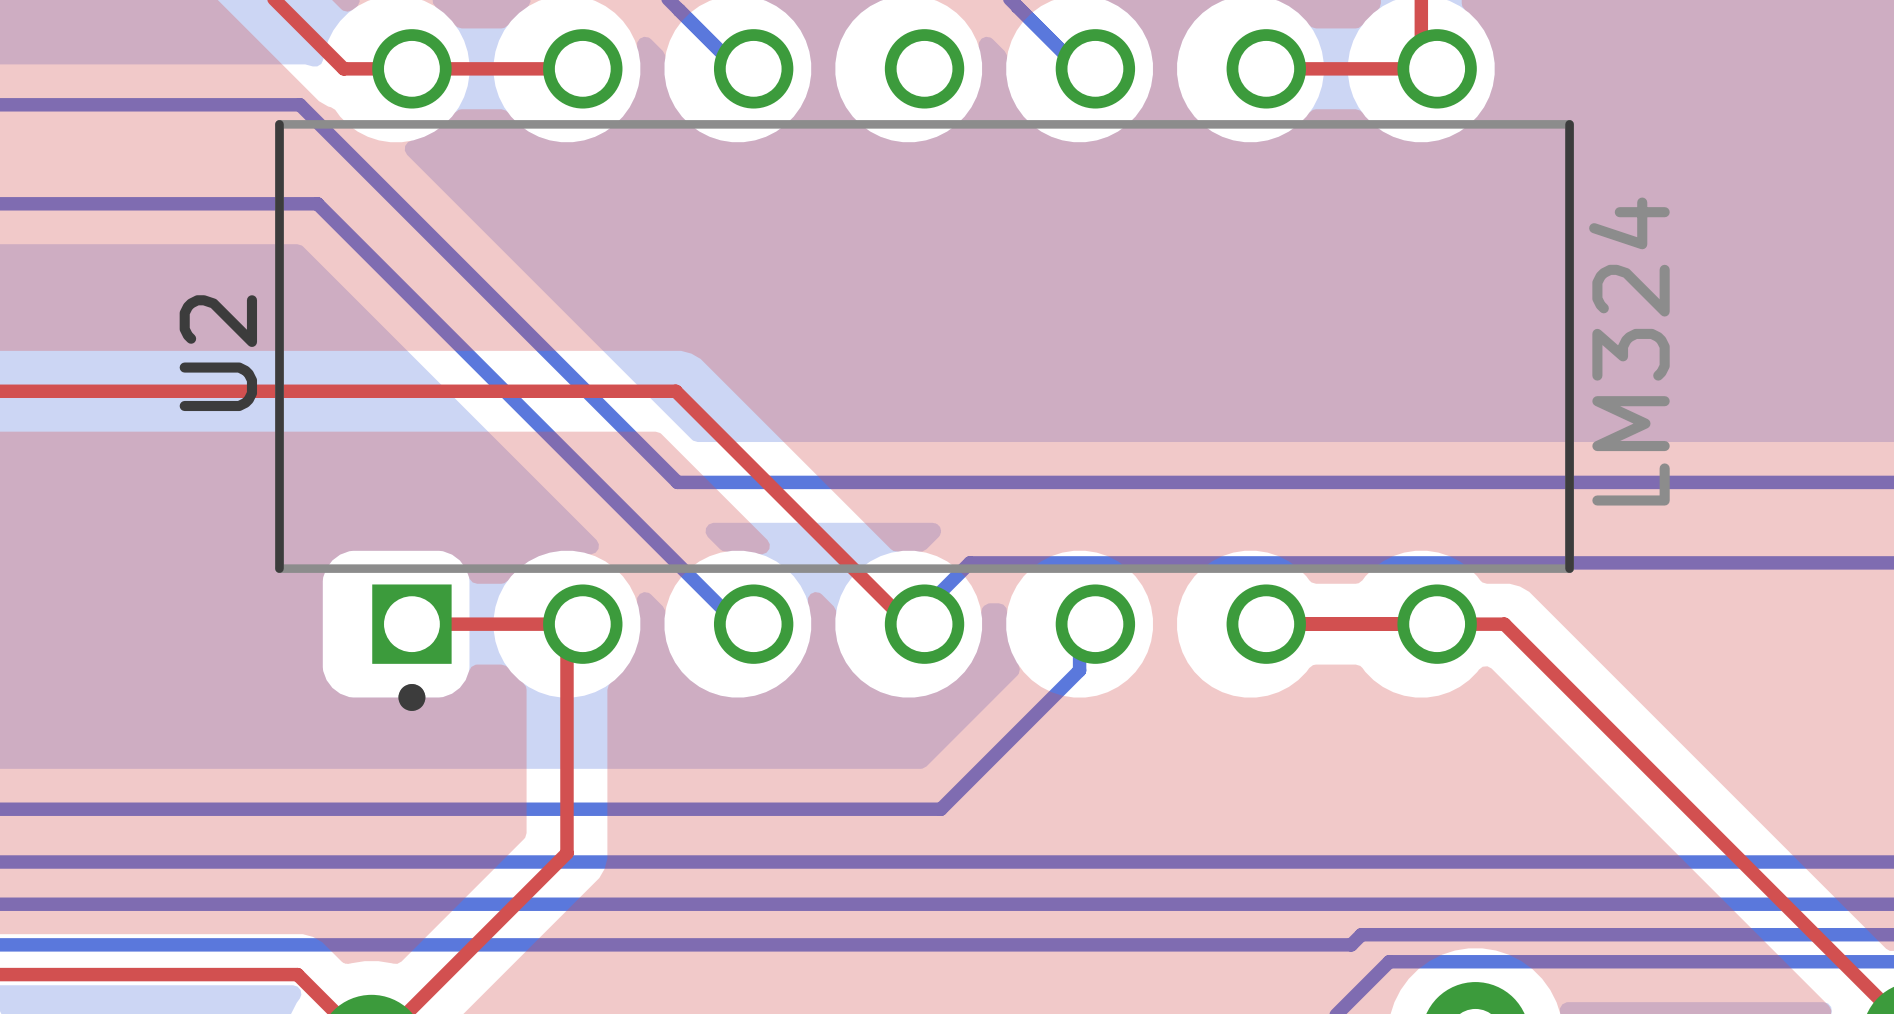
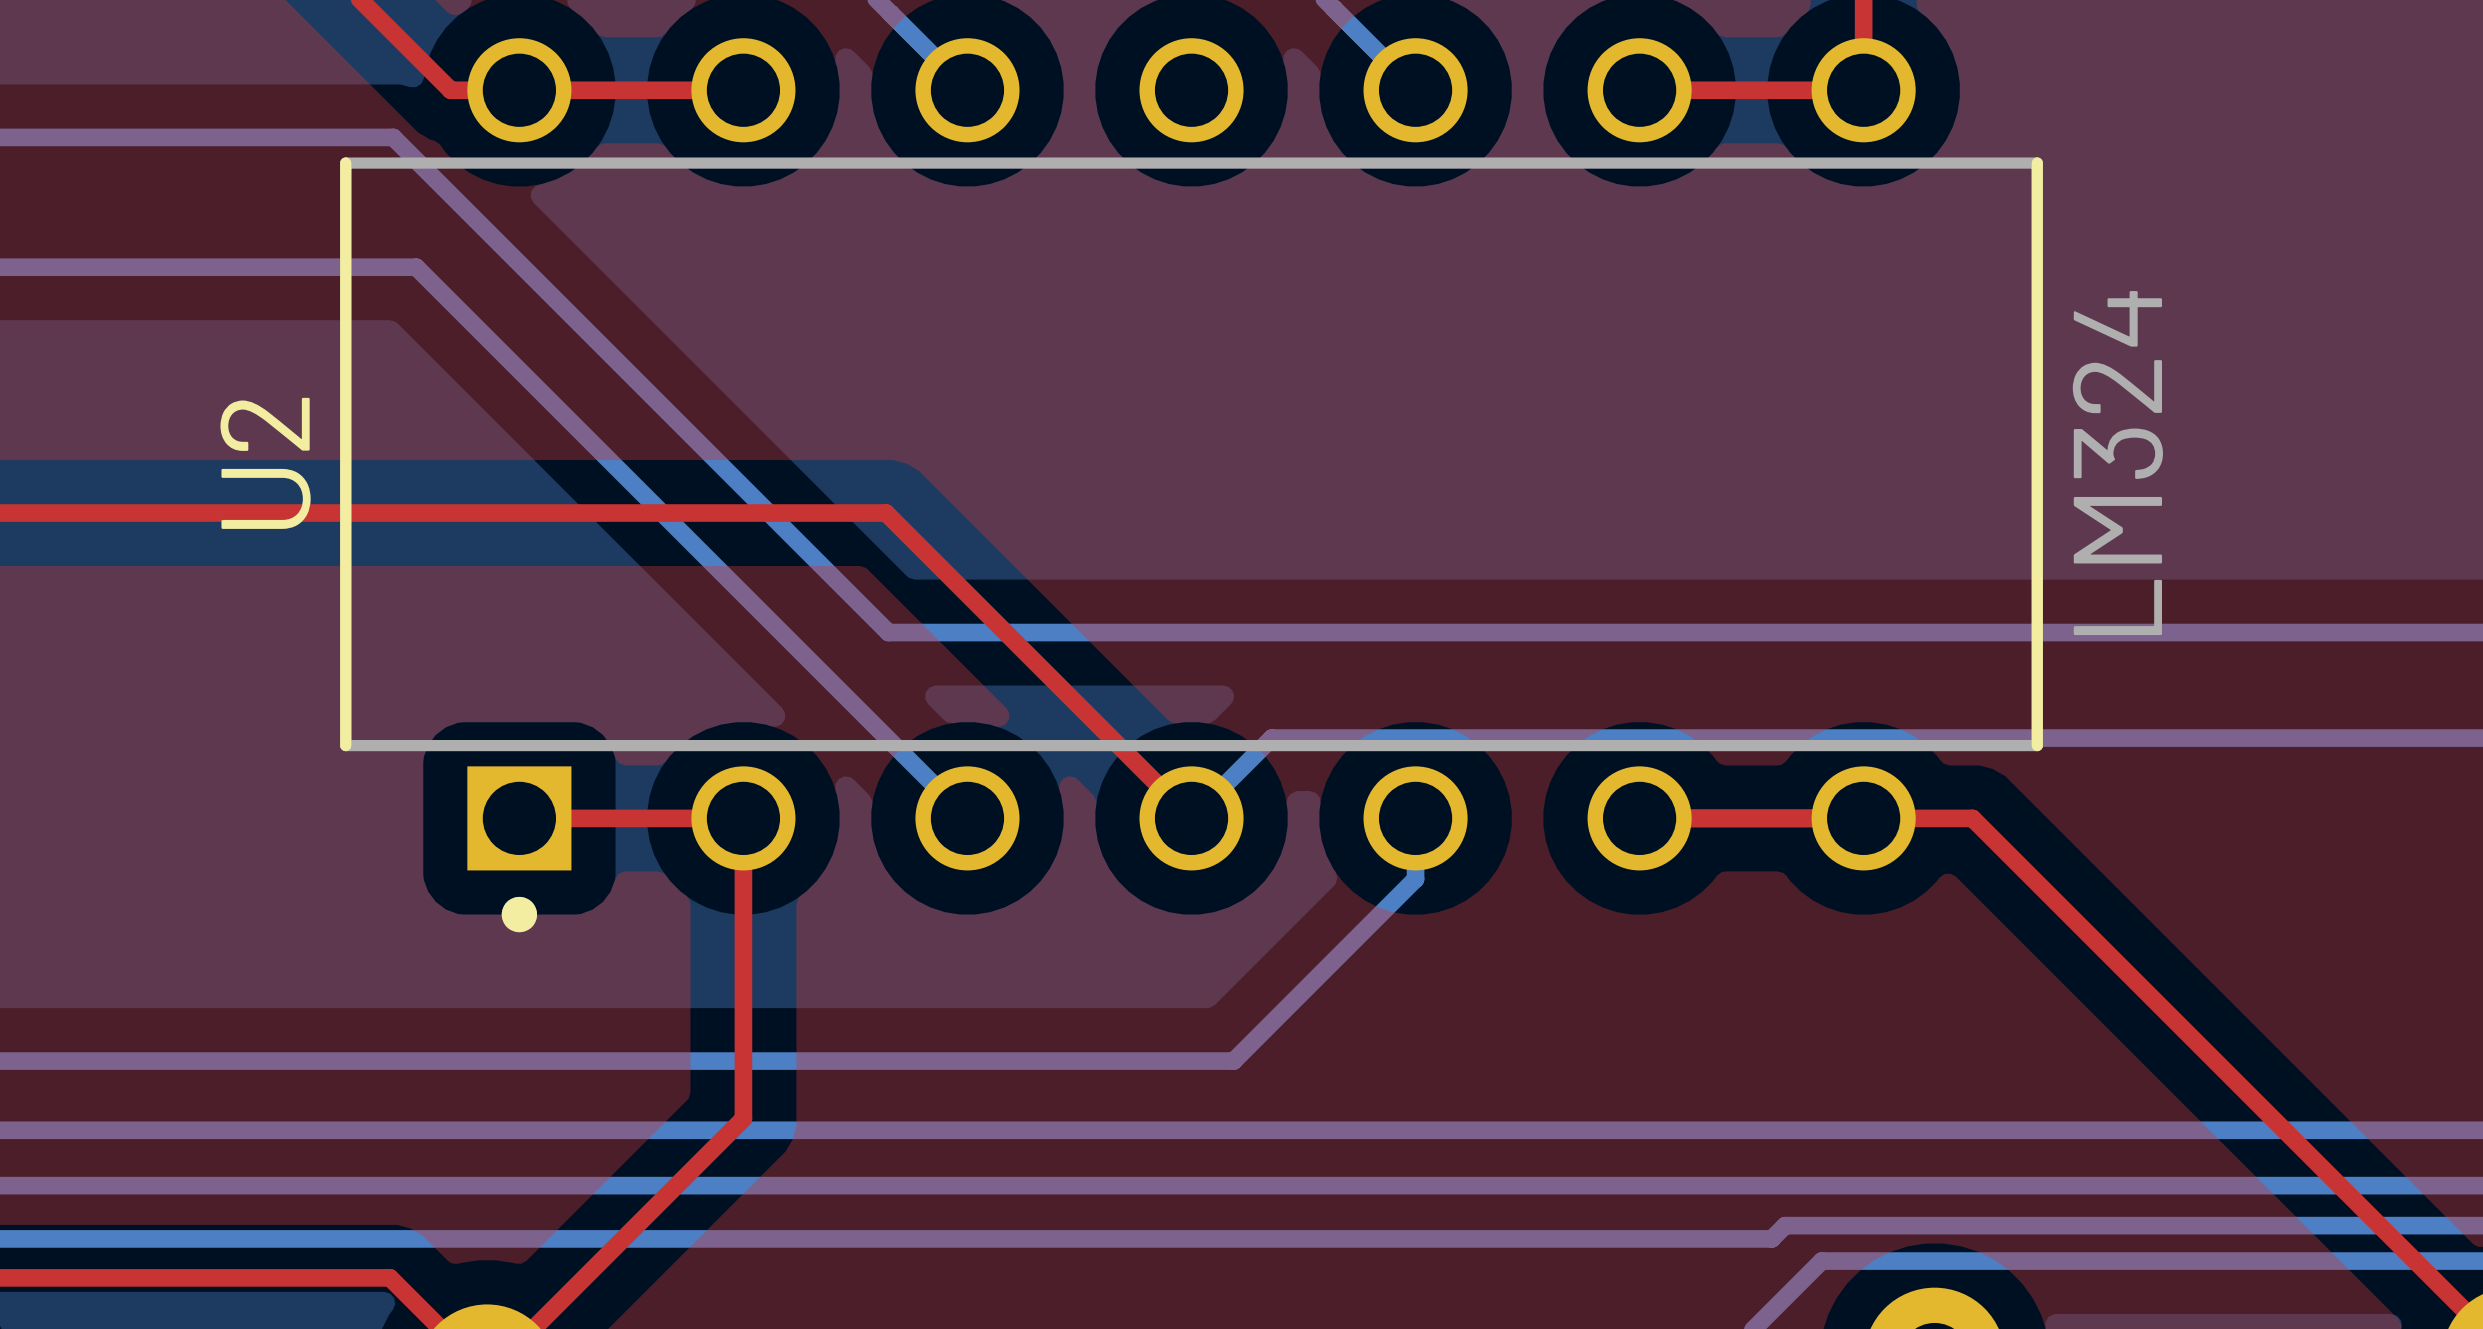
U2 position: (924, 370) -> (1191, 485)

